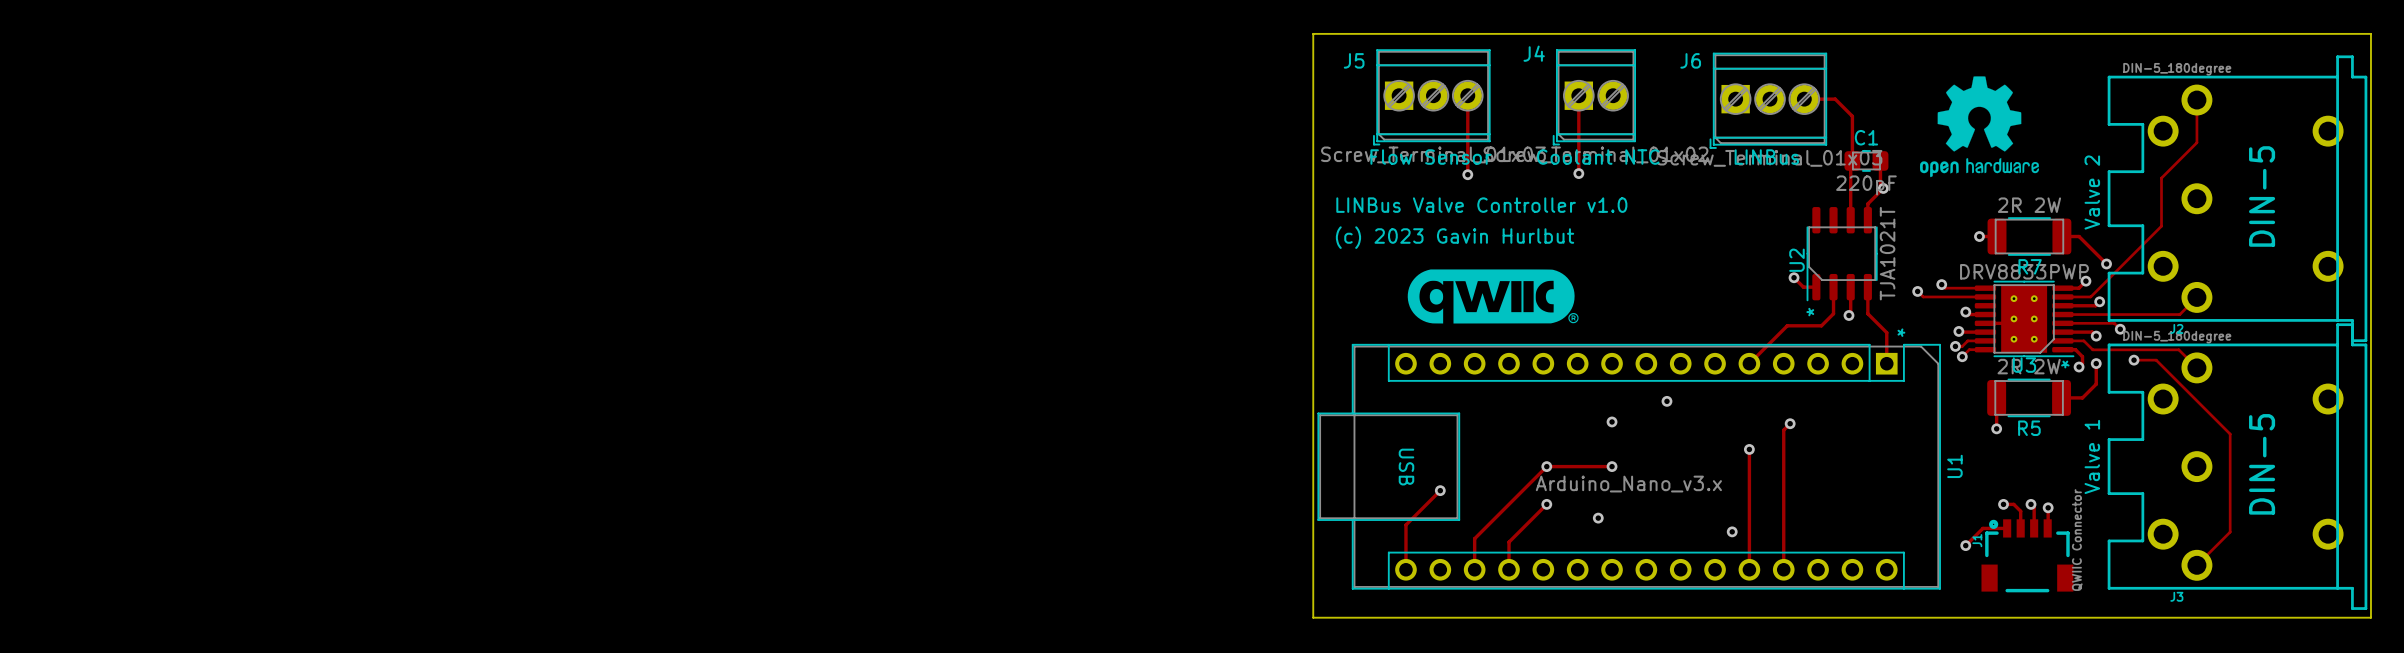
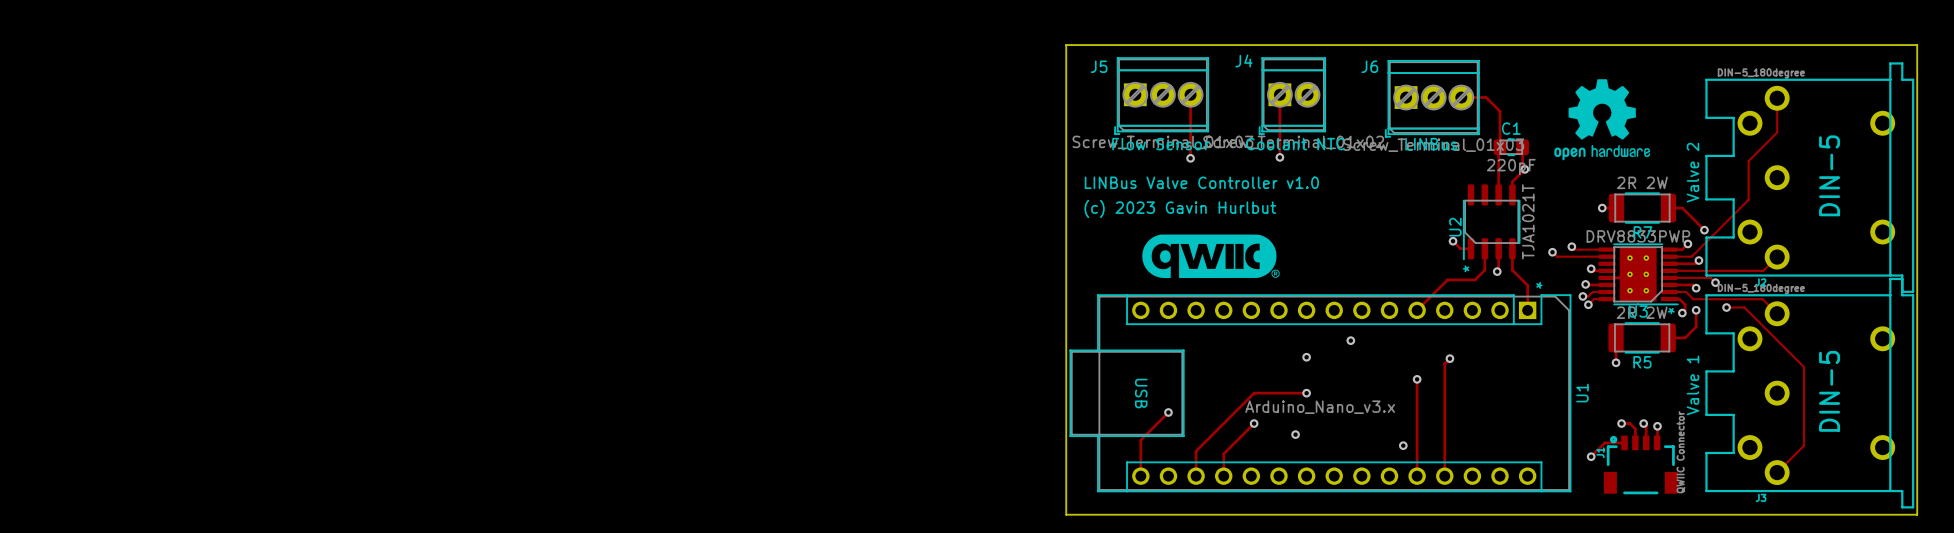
via: (1546, 466) -> none

